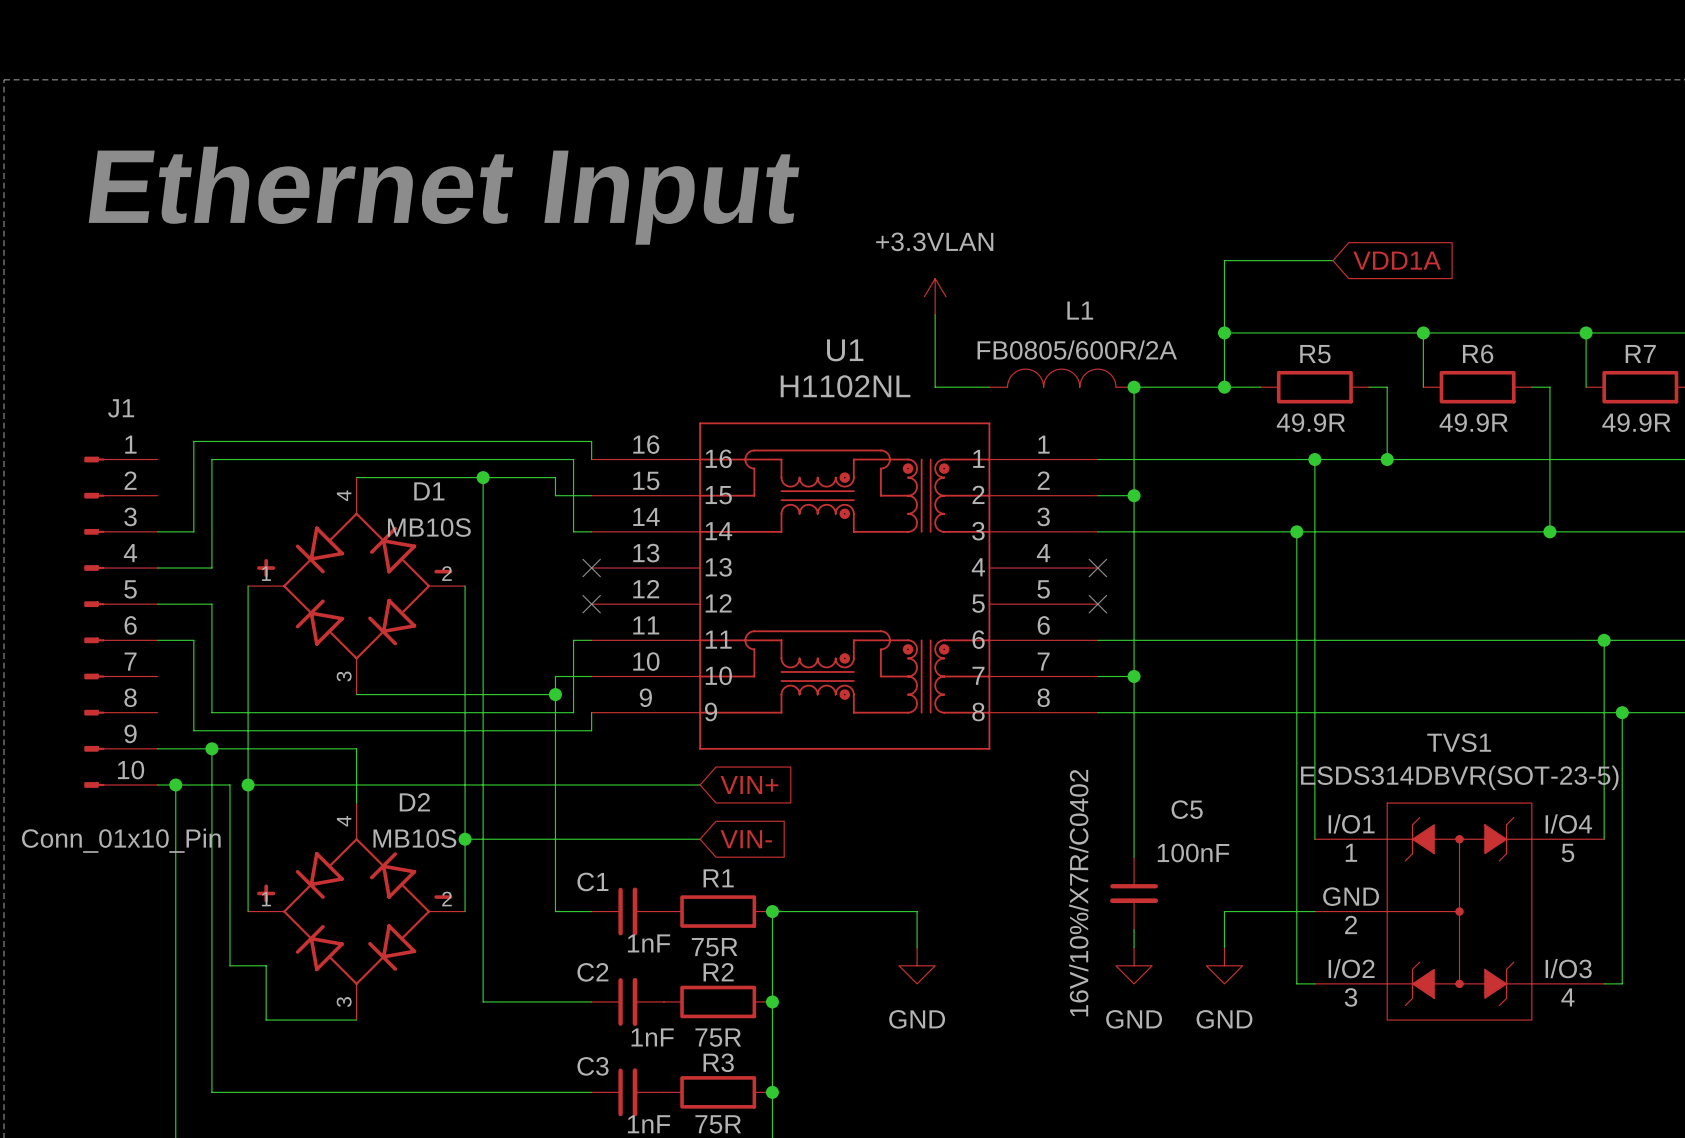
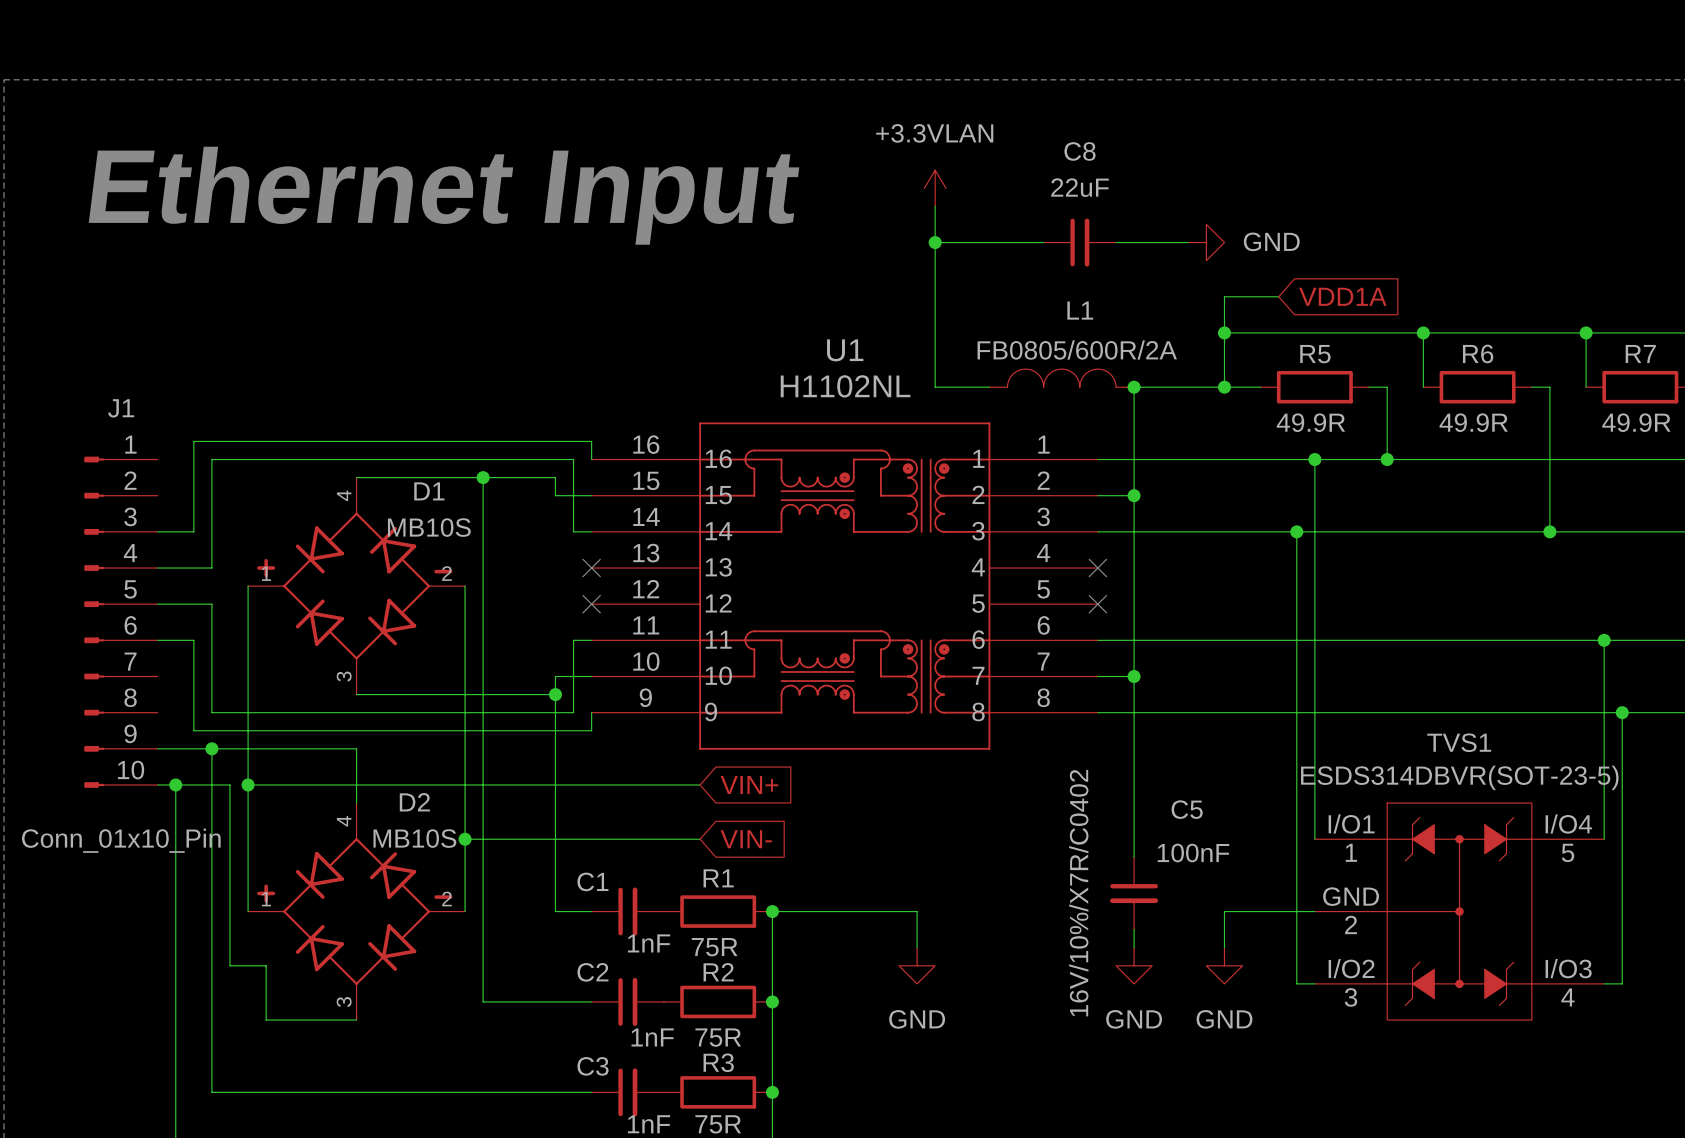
wire: none -> (935, 206) (935, 314)
wire: none -> (935, 242) (1043, 242)
junction: none -> (935, 242)
C8: none -> 22uF (1079, 242)
wire: none -> (1115, 242) (1188, 242)
power symbol: none -> GND (1206, 242)
wire: (1332, 260) (1224, 260) (1224, 296) -> (1278, 296) (1224, 296)
global label position: VDD1A (1397, 260) -> VDD1A (1342, 296)
power symbol position: +3.3VLAN (935, 296) -> +3.3VLAN (935, 188)

